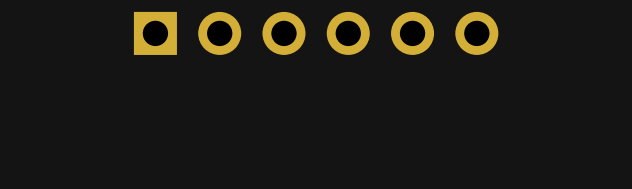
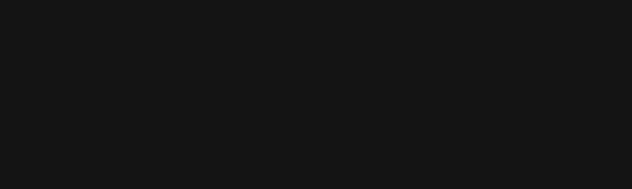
part: (316, 33) -> none

